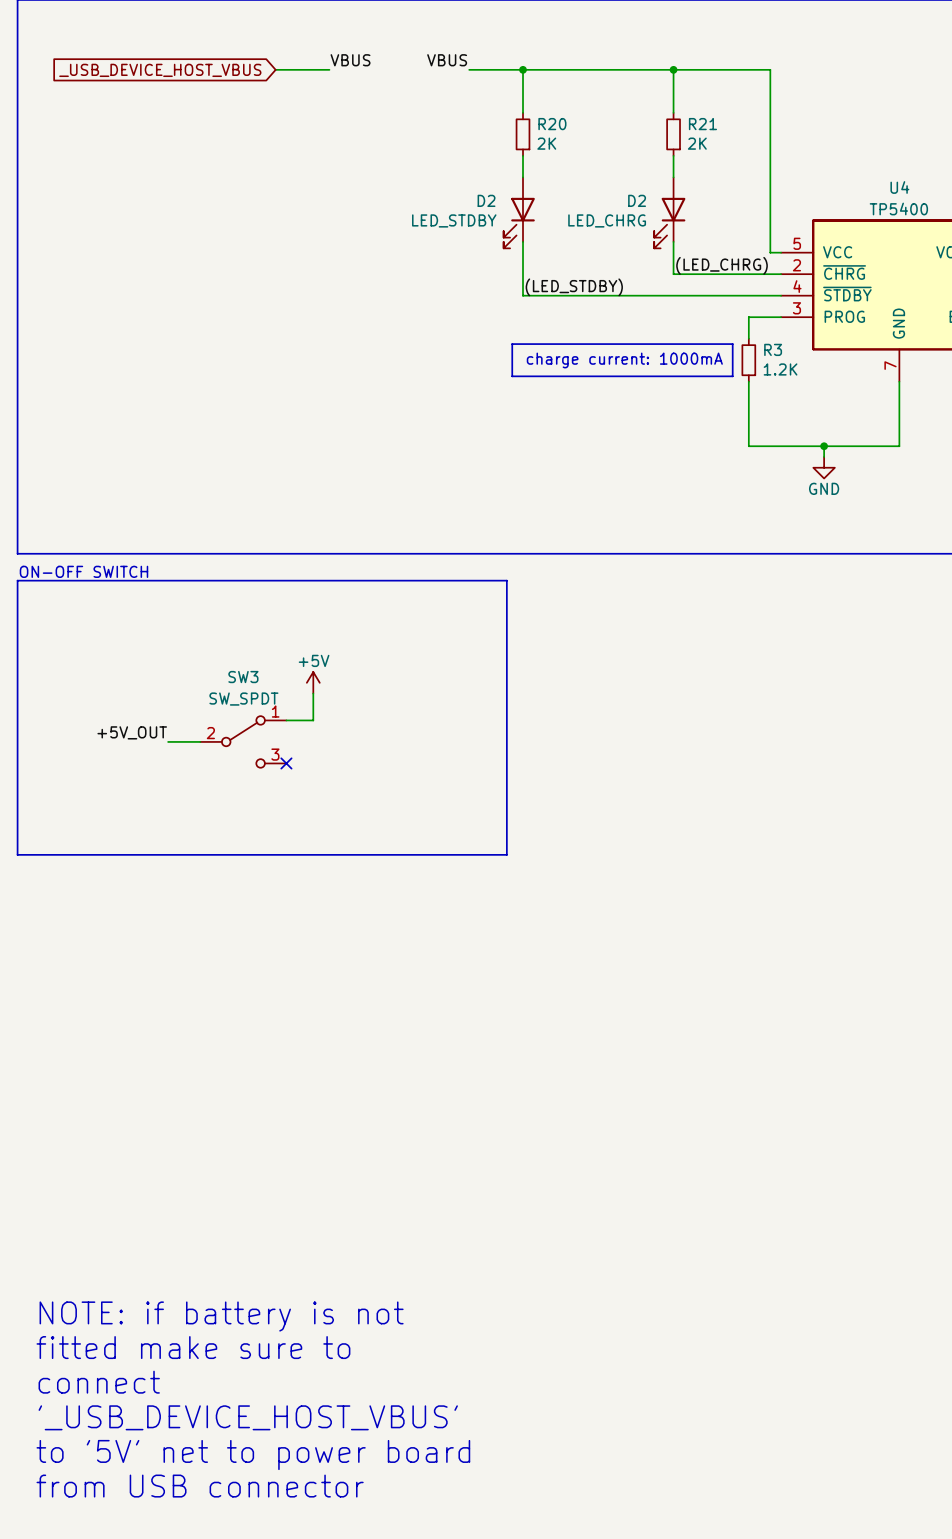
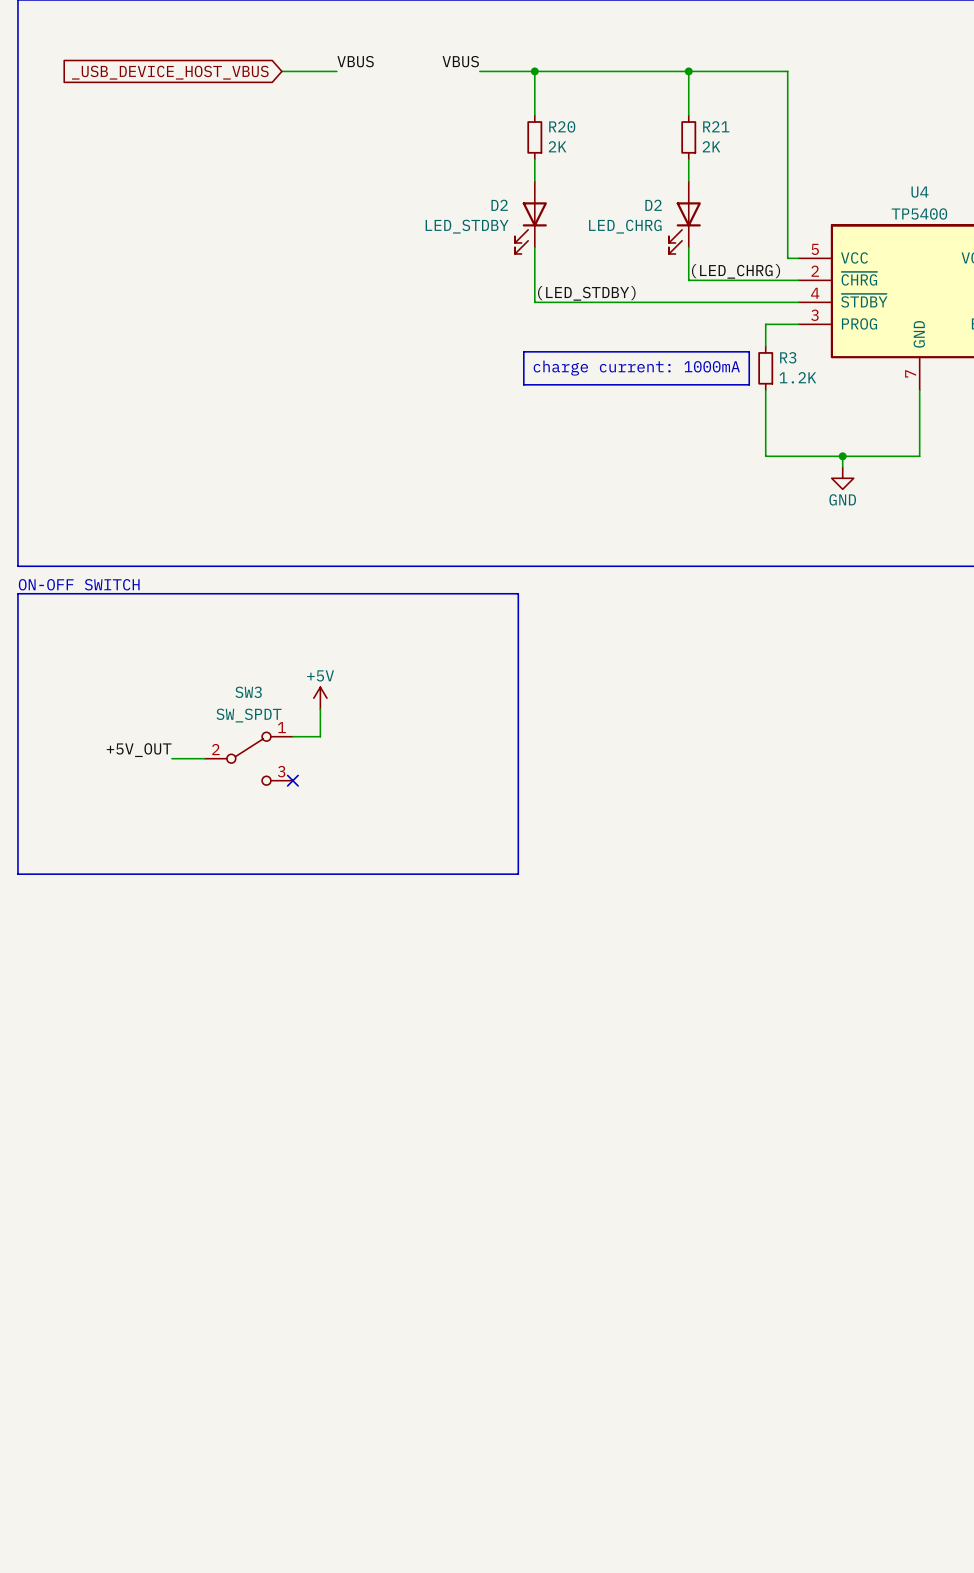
text: NOTE: if battery is not (221, 1316) -> none
text: fitted make sure to (193, 1347) -> none
text: connect (99, 1382) -> none
text: '_USB_DEVICE_HOST_VBUS' (248, 1417) -> none
text: to '5V' net to power board (253, 1455) -> none
text: from USB connector (200, 1486) -> none

